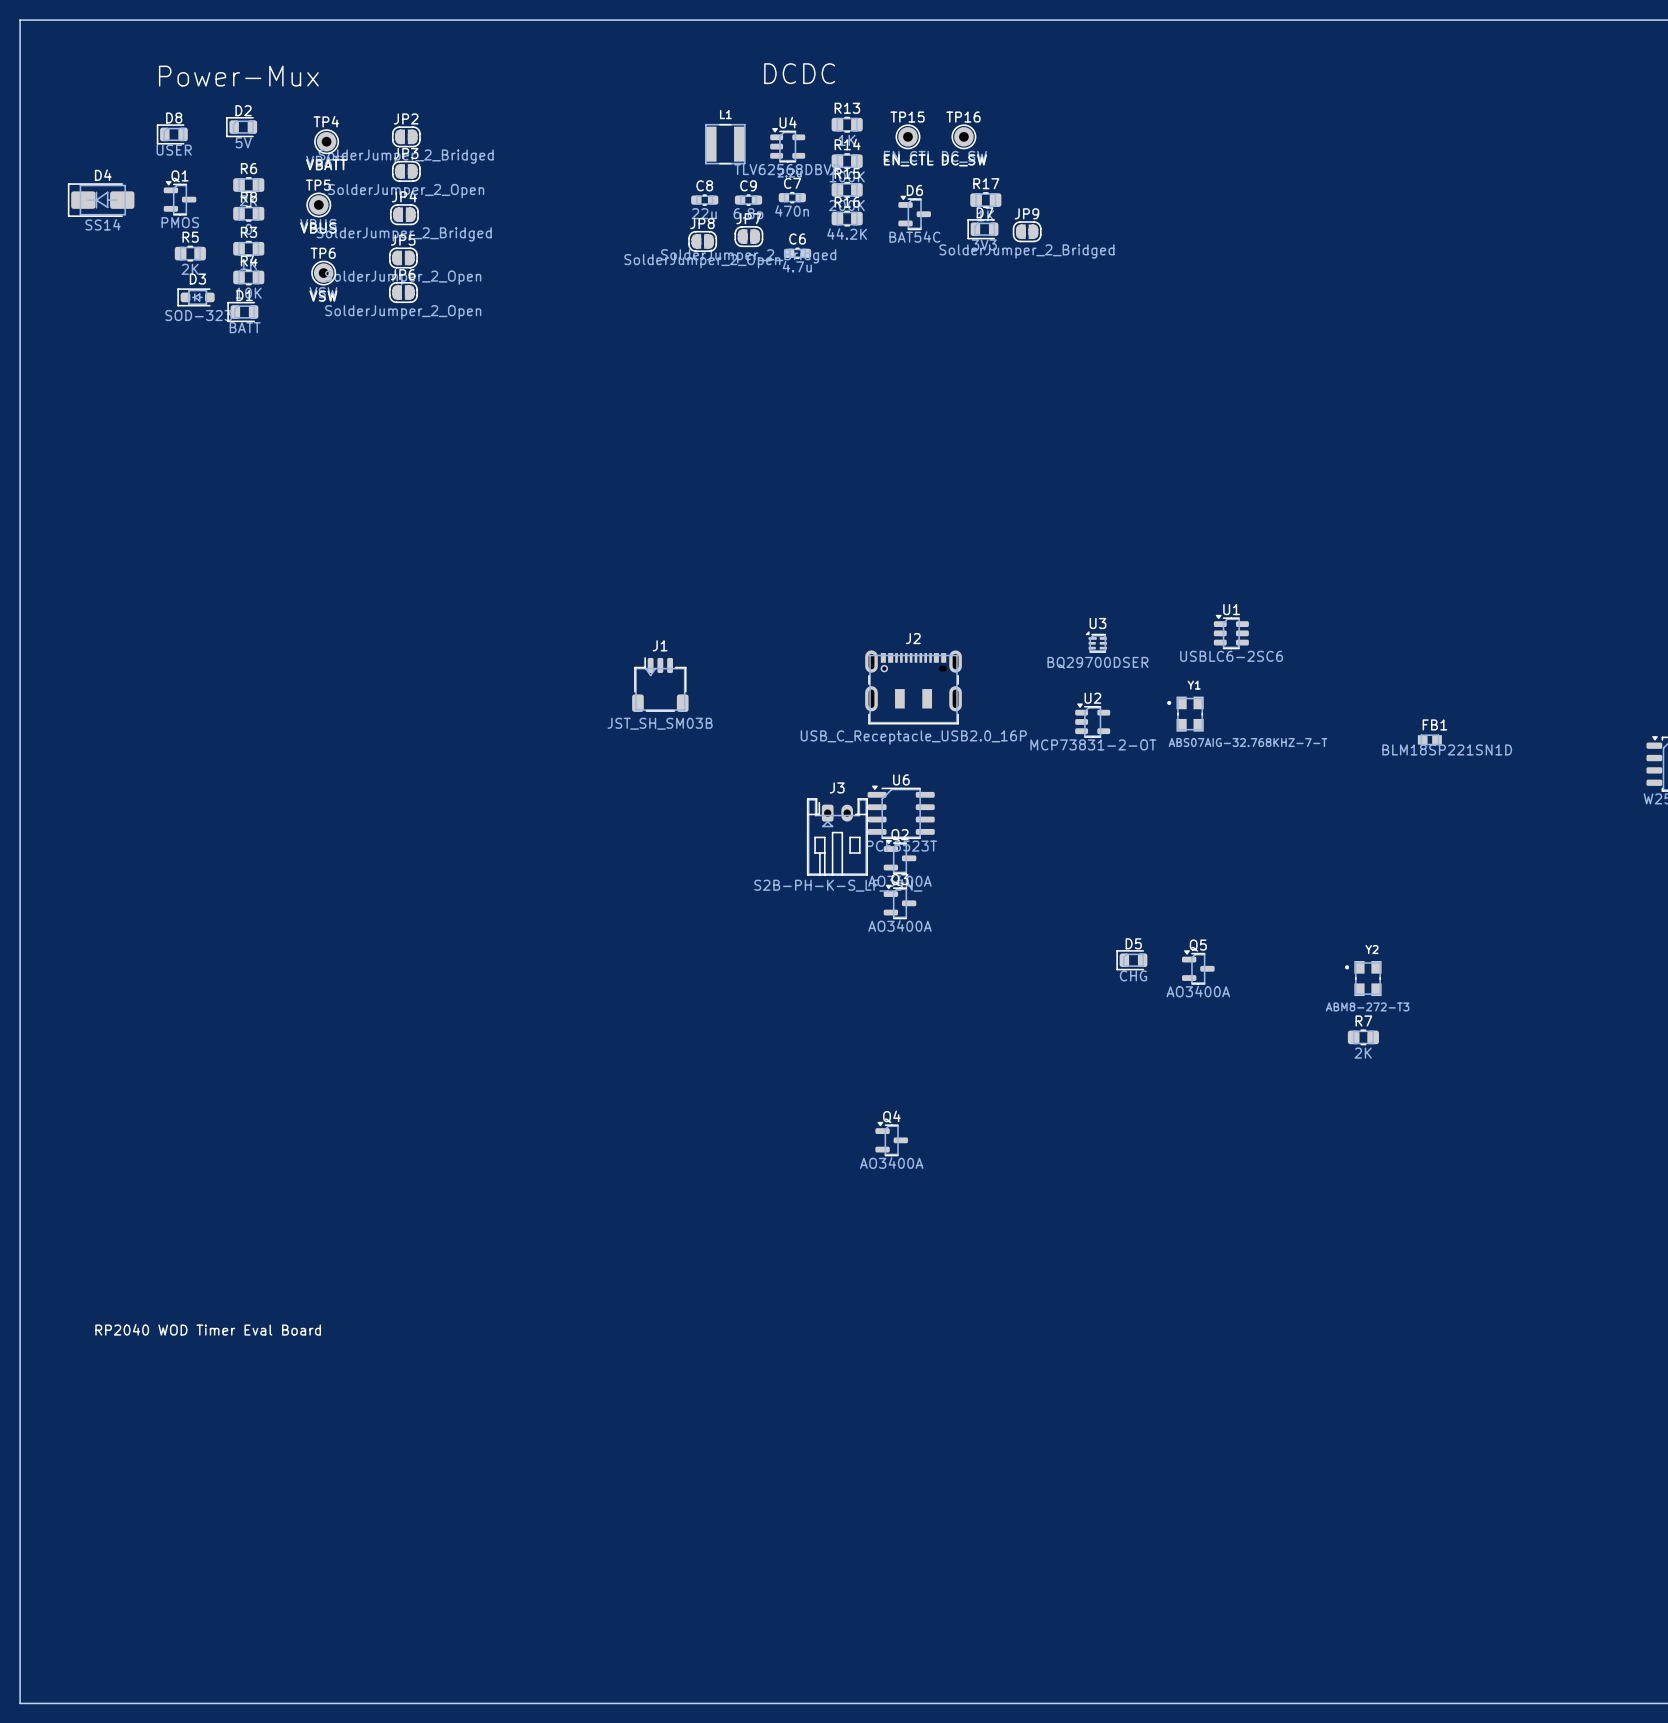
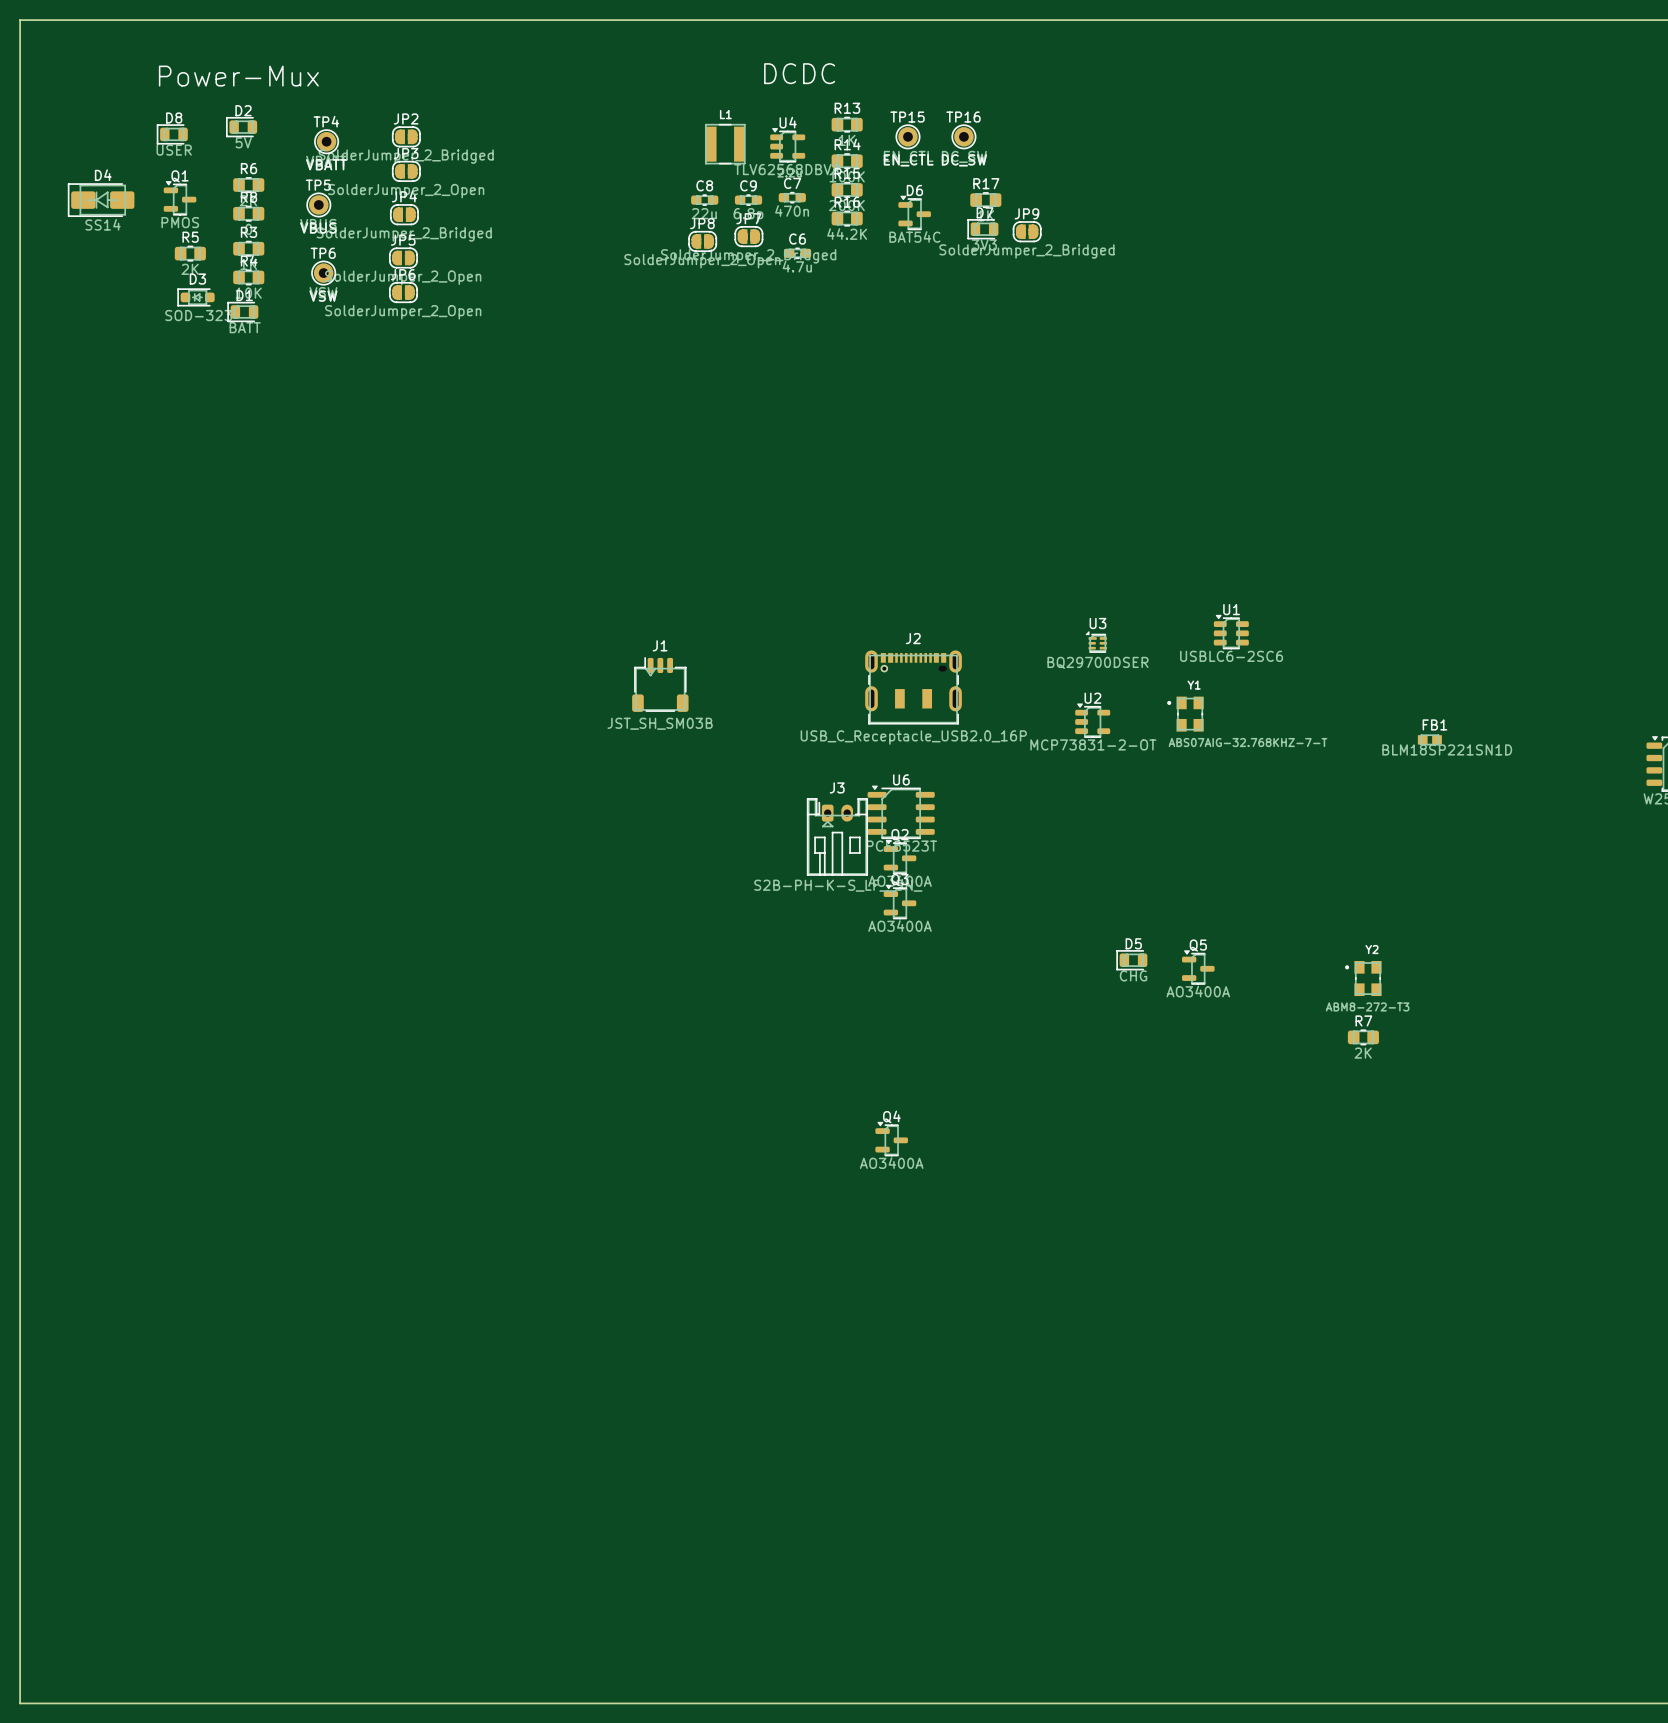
text: RP2040 WOD Timer Eval Board (208, 1329) -> none

